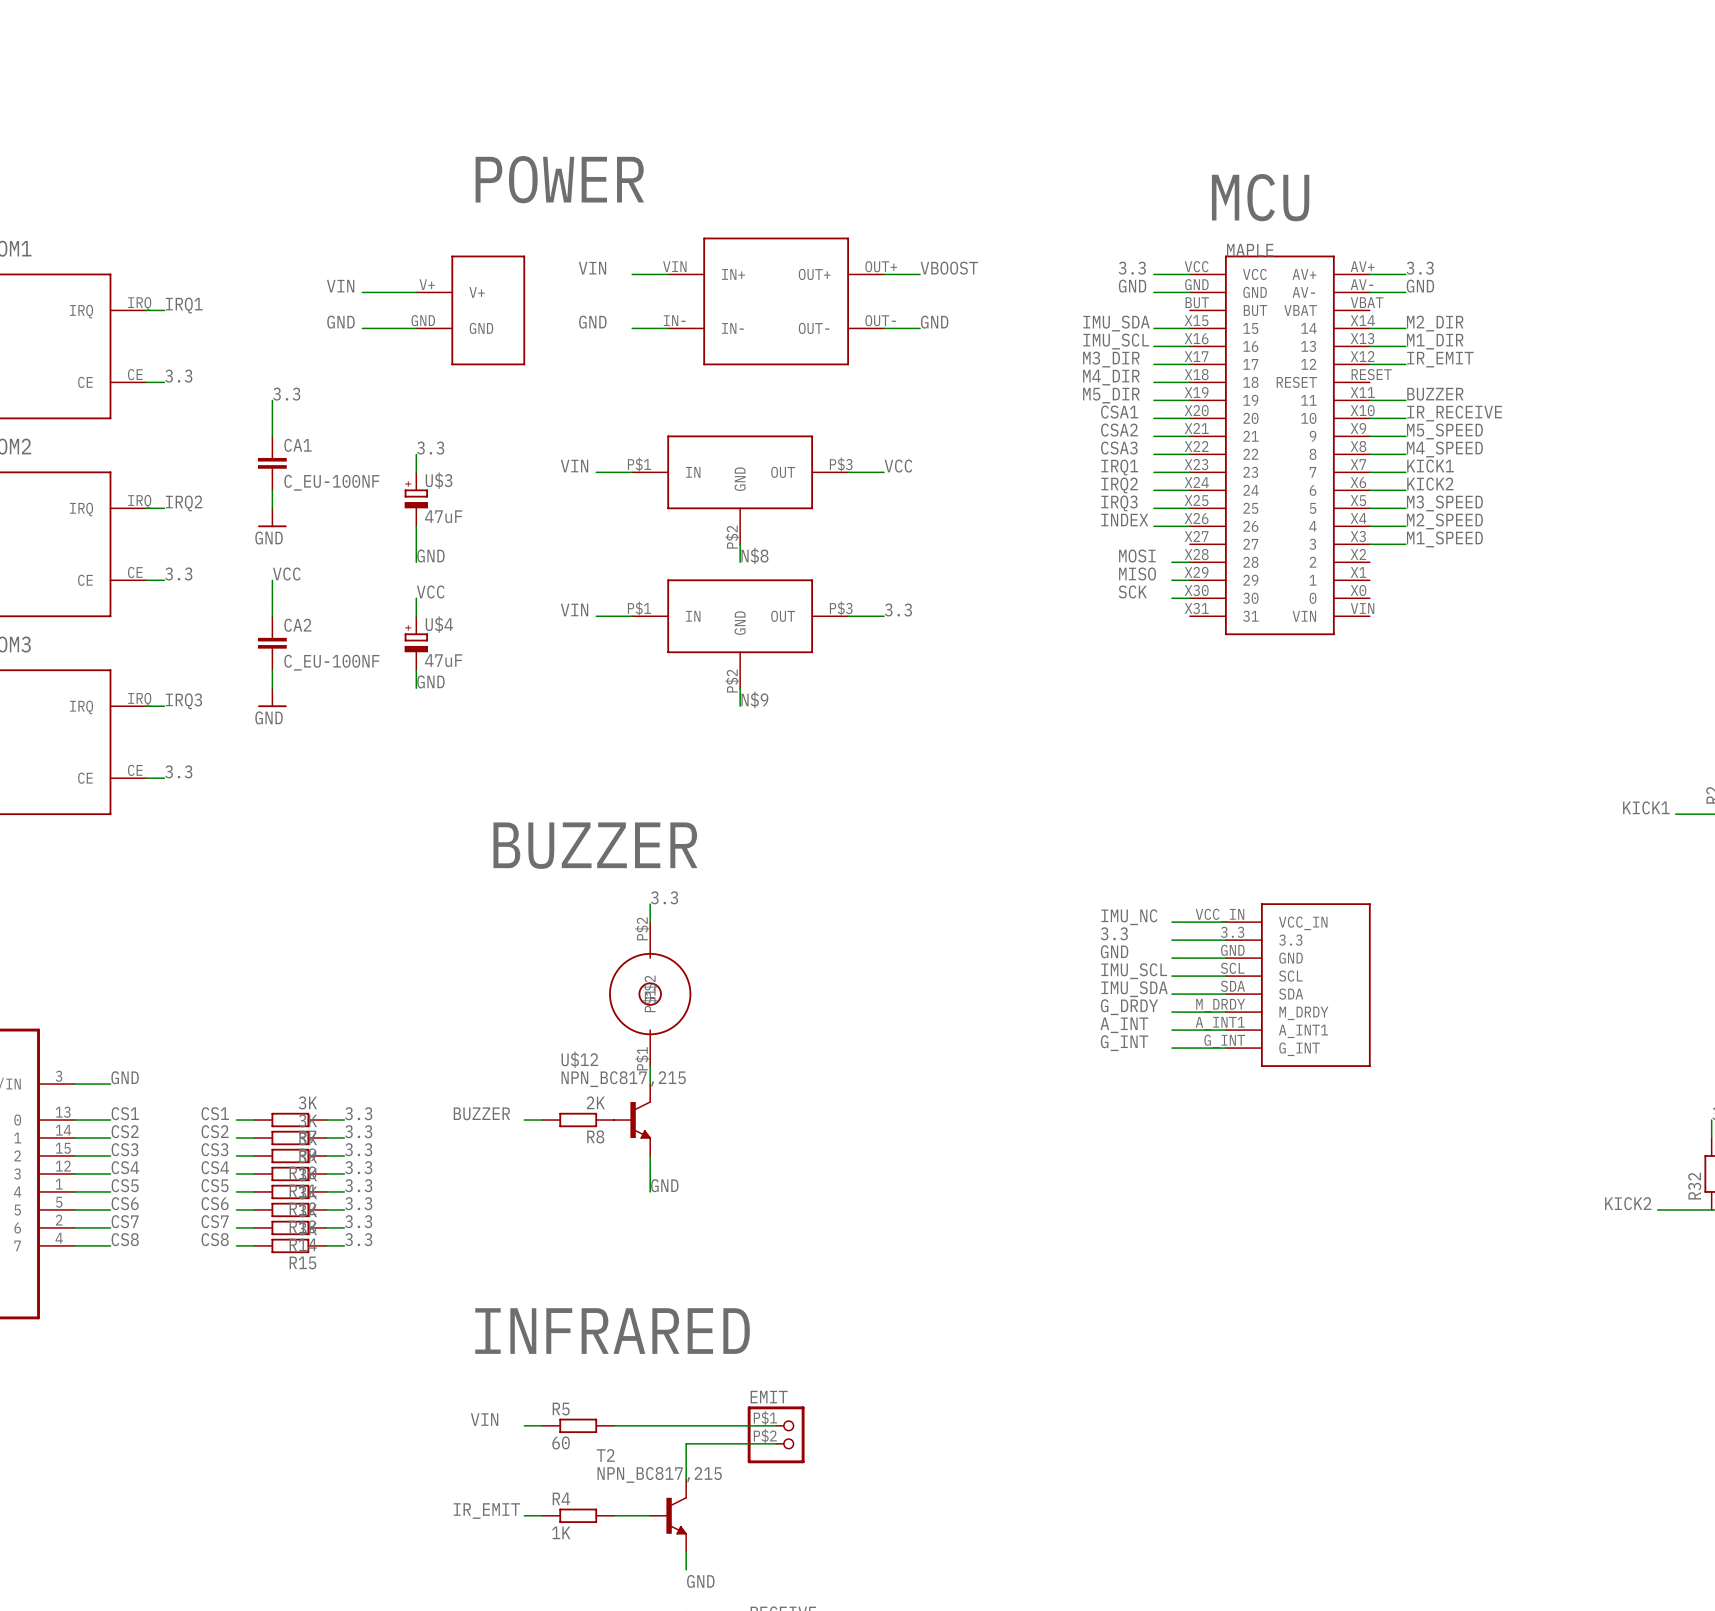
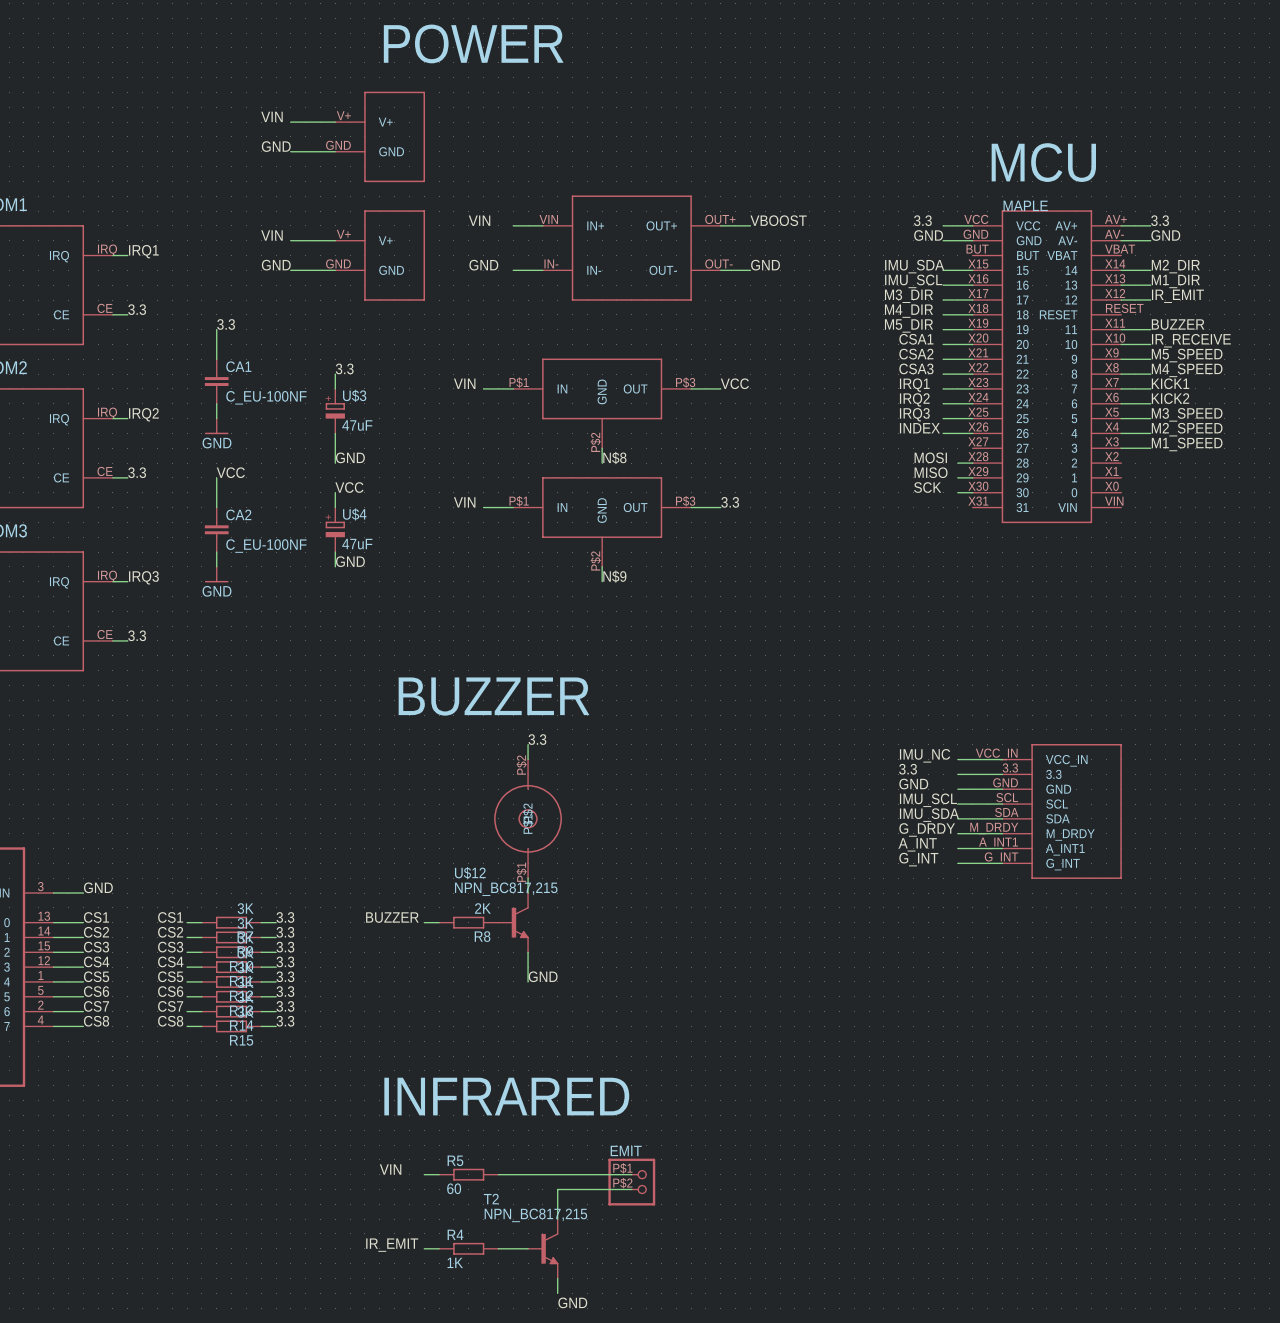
label: none -> VIN (271, 116)
wire: none -> (290, 122) (335, 122)
part: none -> (380, 136)
label: none -> GND (276, 146)
text position: POWER (559, 179) -> POWER (473, 43)
wire: none -> (290, 151) (335, 151)

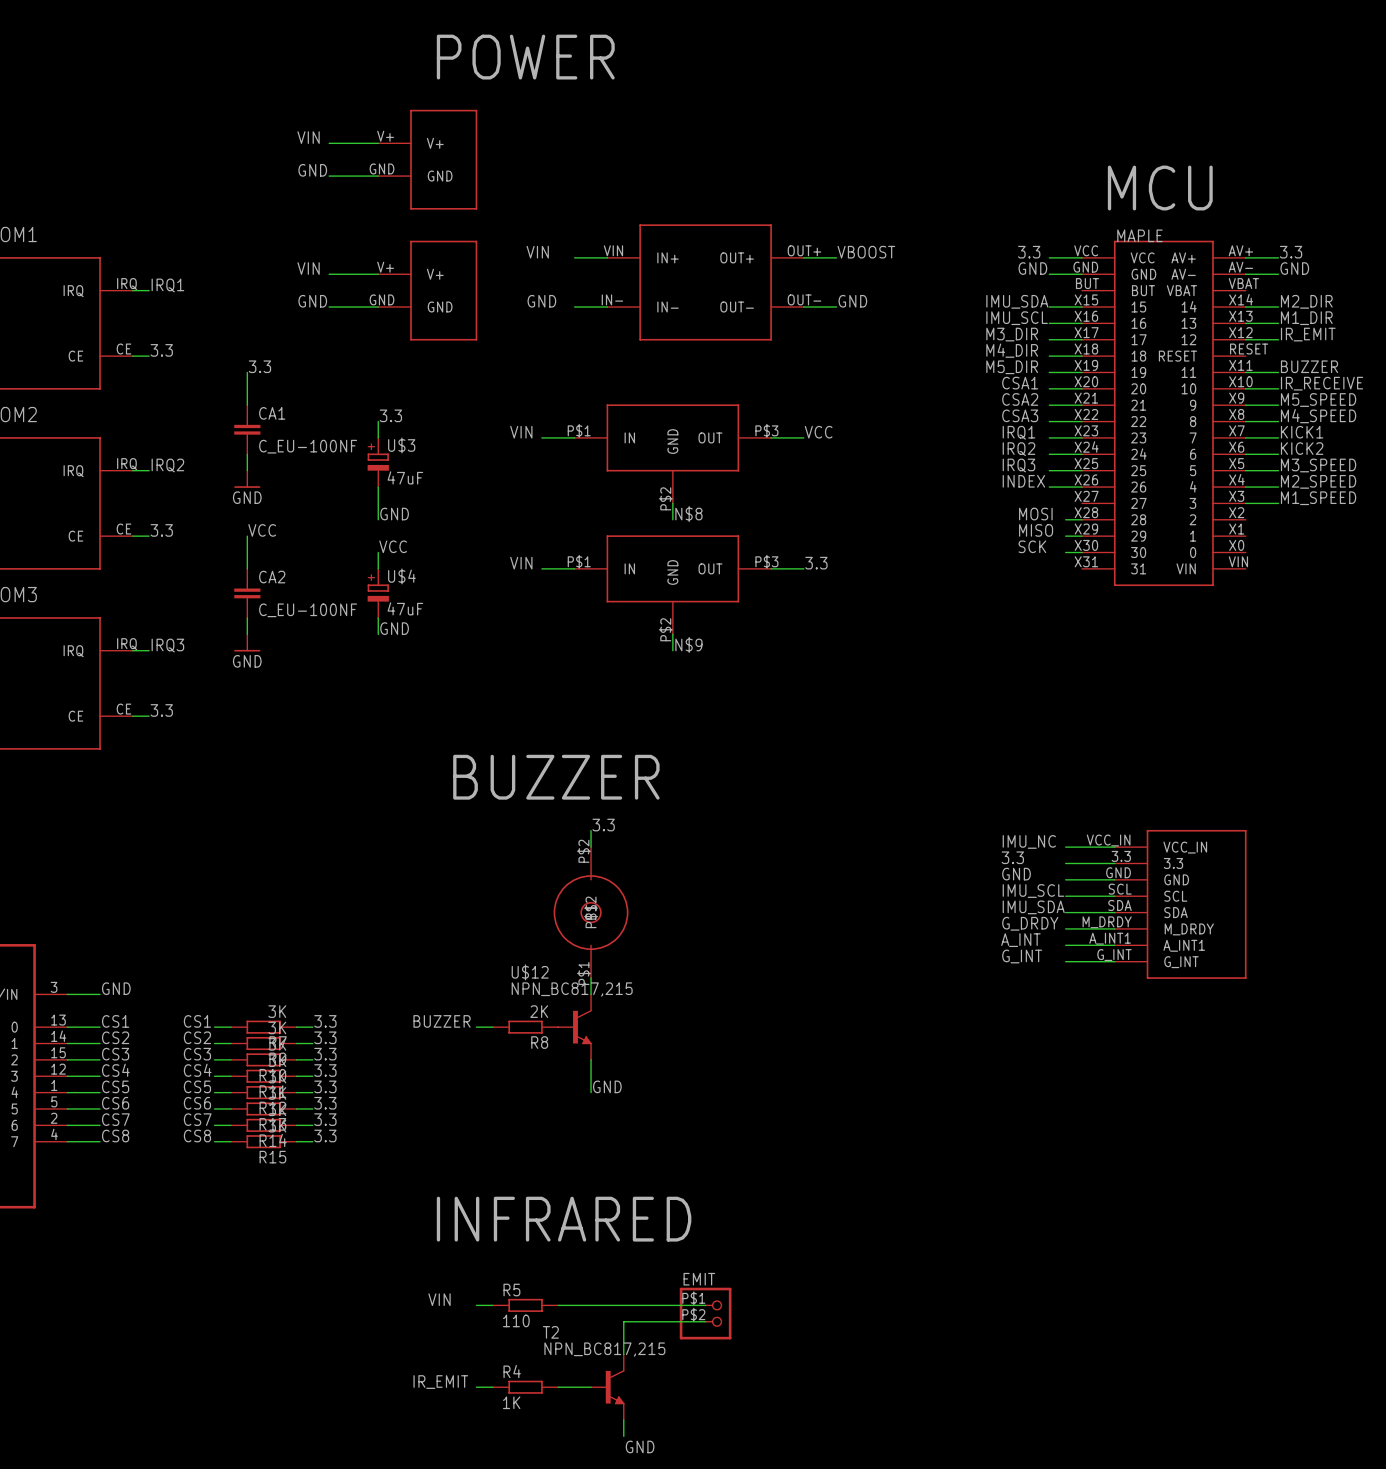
R5 value: 60 (454, 1188) -> 110 (516, 1320)

